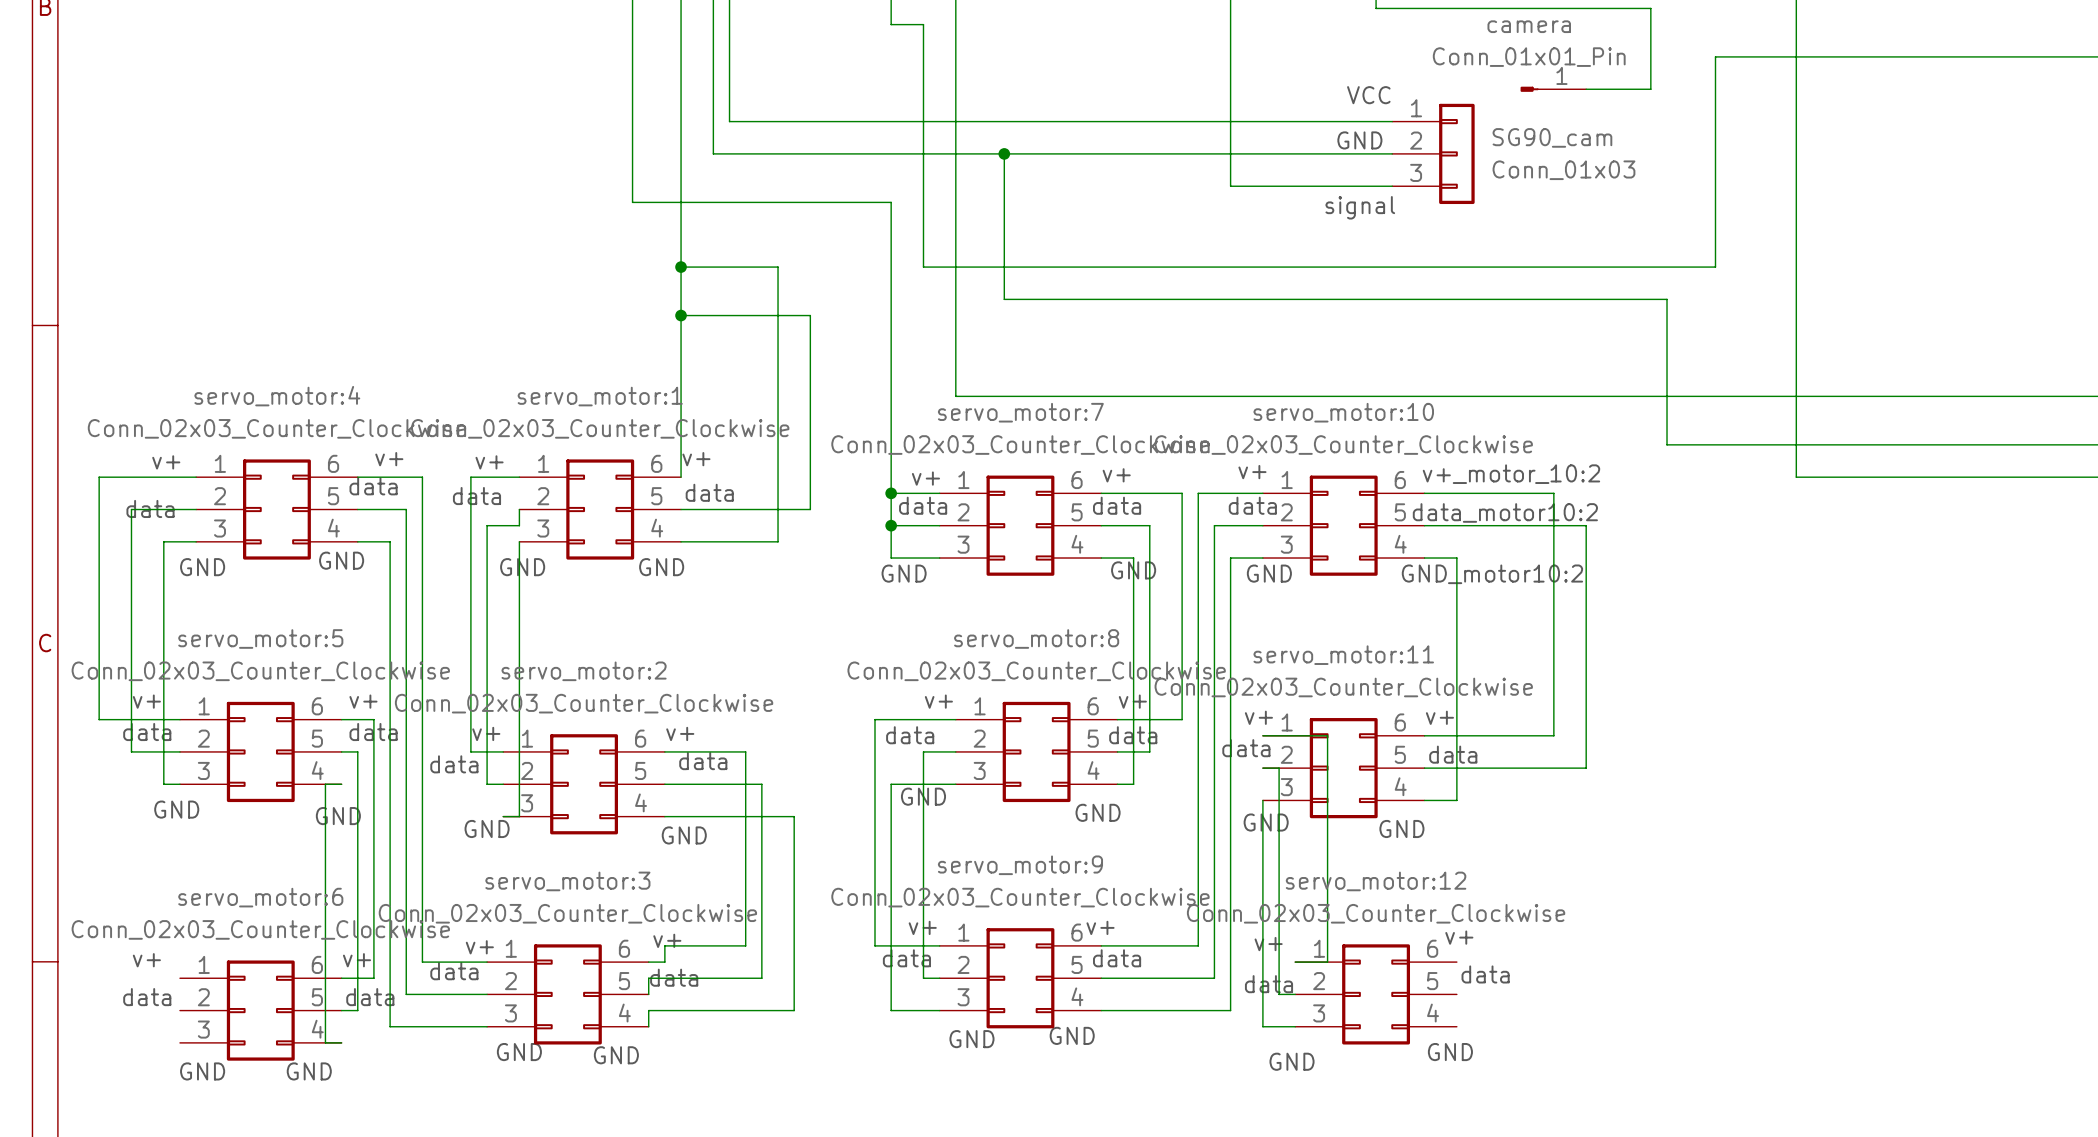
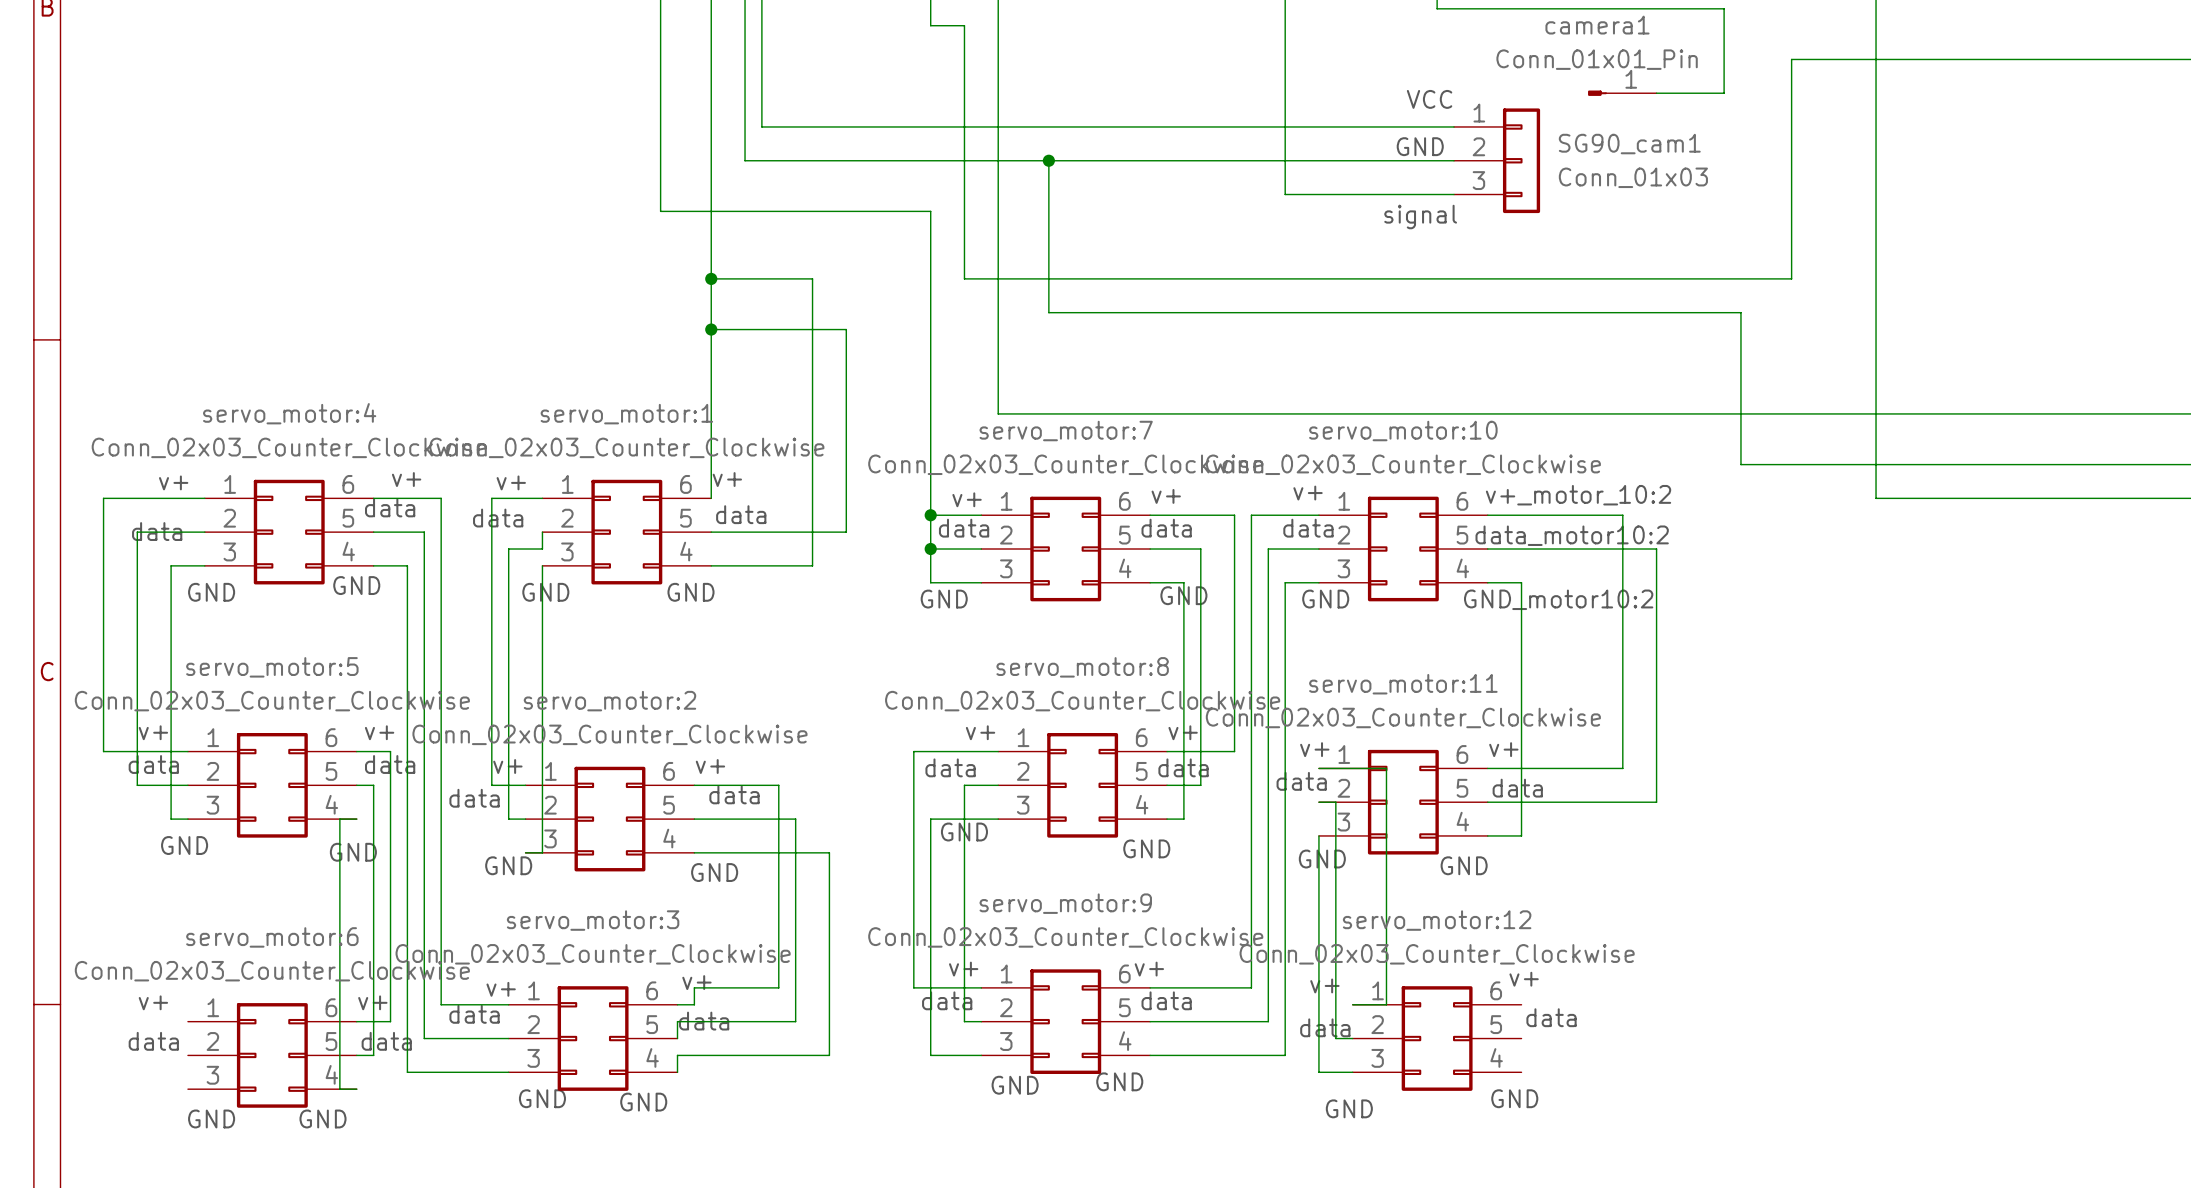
camera name: camera (1529, 26) -> camera1 (1597, 25)
SG90_cam name: SG90_cam (1552, 137) -> SG90_cam1 (1629, 144)

